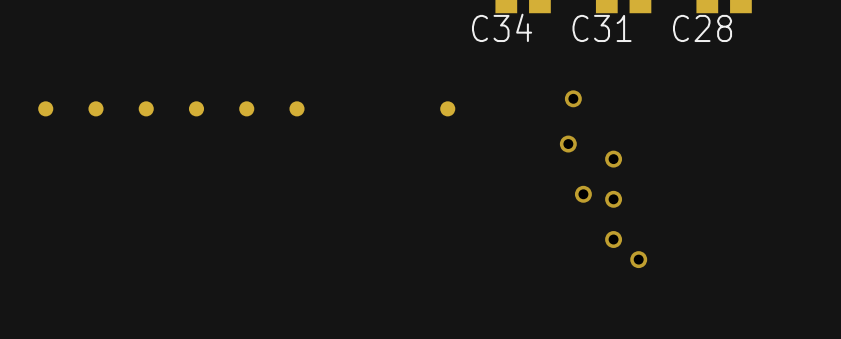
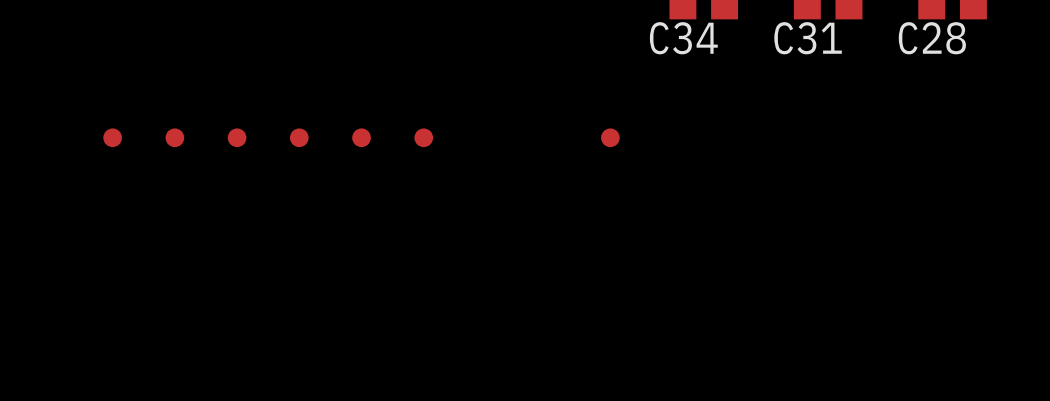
via: (573, 98) -> none
via: (568, 144) -> none
via: (613, 159) -> none
via: (583, 194) -> none
via: (613, 199) -> none
via: (613, 239) -> none
via: (638, 259) -> none

